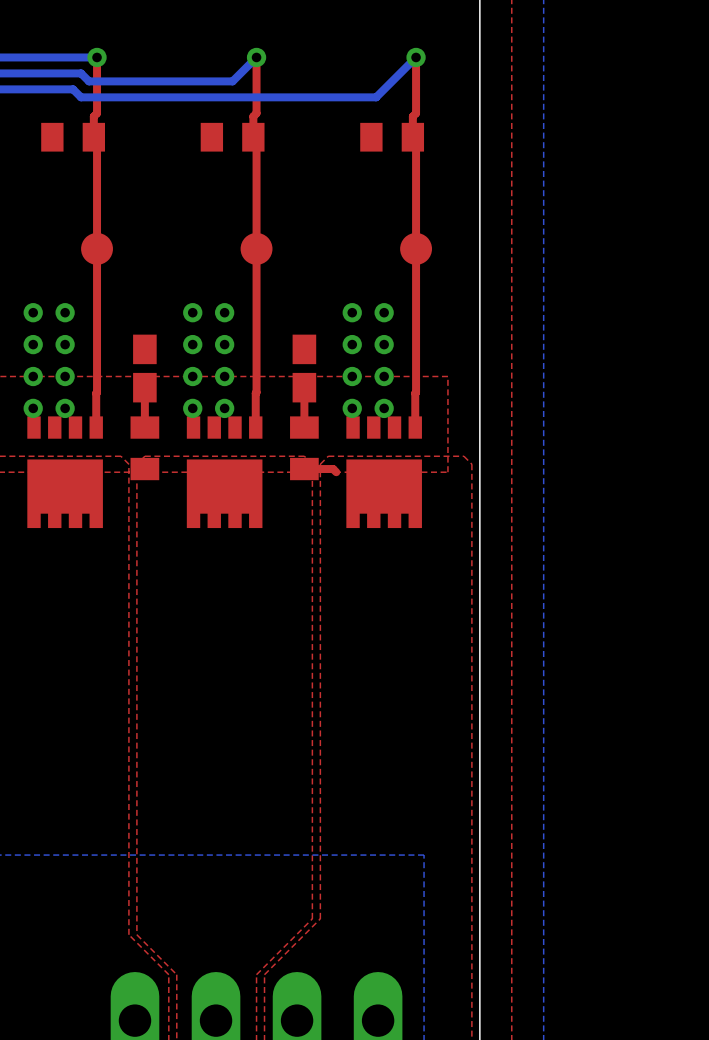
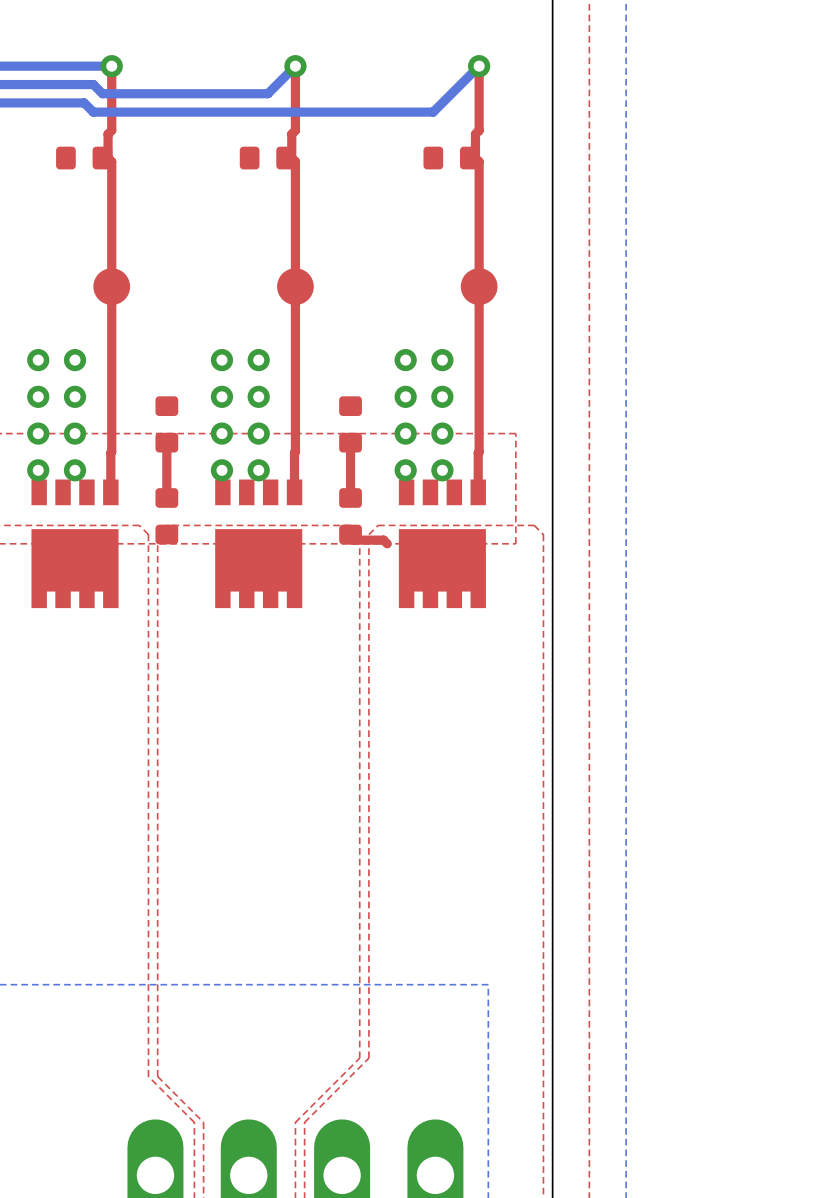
part footprint: [41, 122, 106, 152] -> [56, 146, 113, 170]
part footprint: [200, 122, 265, 152] -> [239, 146, 296, 170]
part footprint: [360, 122, 425, 152] -> [423, 146, 480, 170]
part footprint: [133, 334, 157, 403] -> [155, 396, 179, 453]
part footprint: [292, 334, 317, 403] -> [339, 396, 362, 453]
part footprint: [130, 416, 160, 481] -> [155, 488, 179, 545]
part footprint: [290, 416, 319, 481] -> [339, 488, 362, 545]

